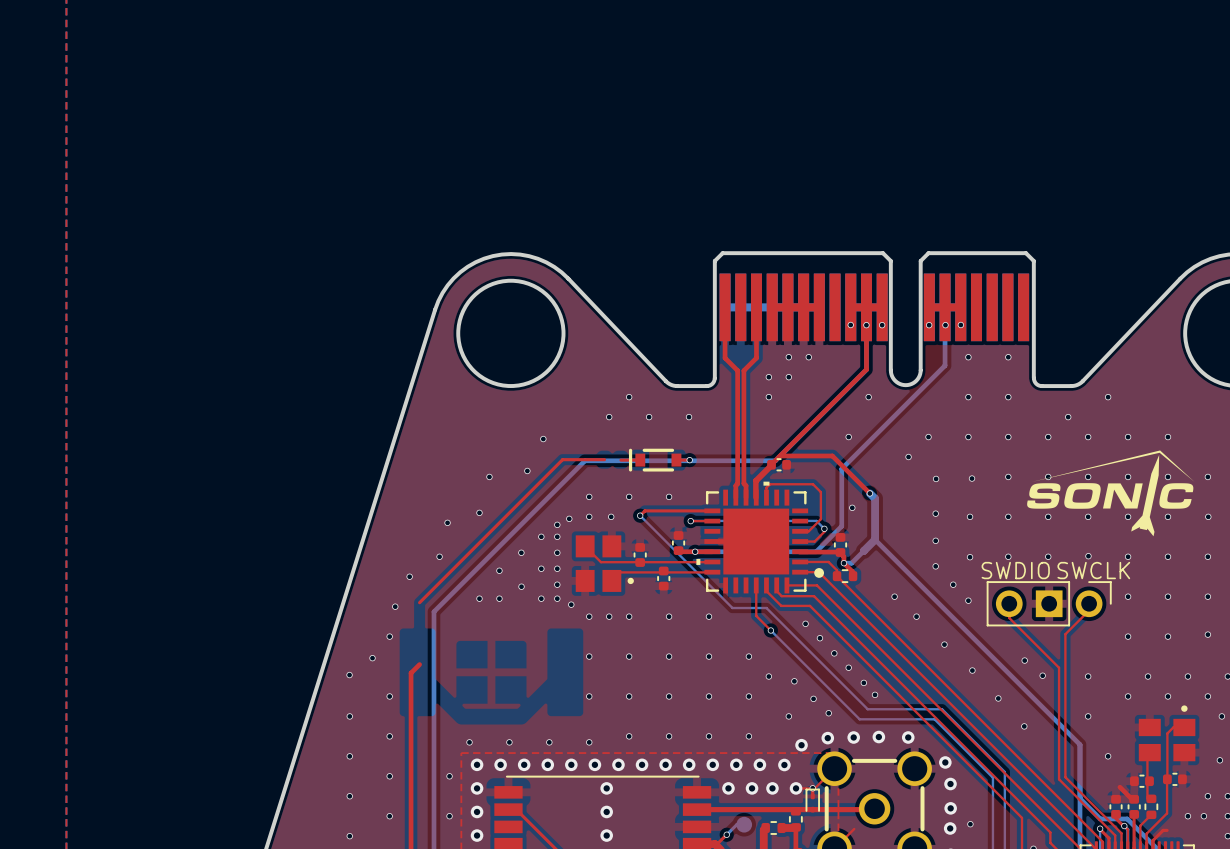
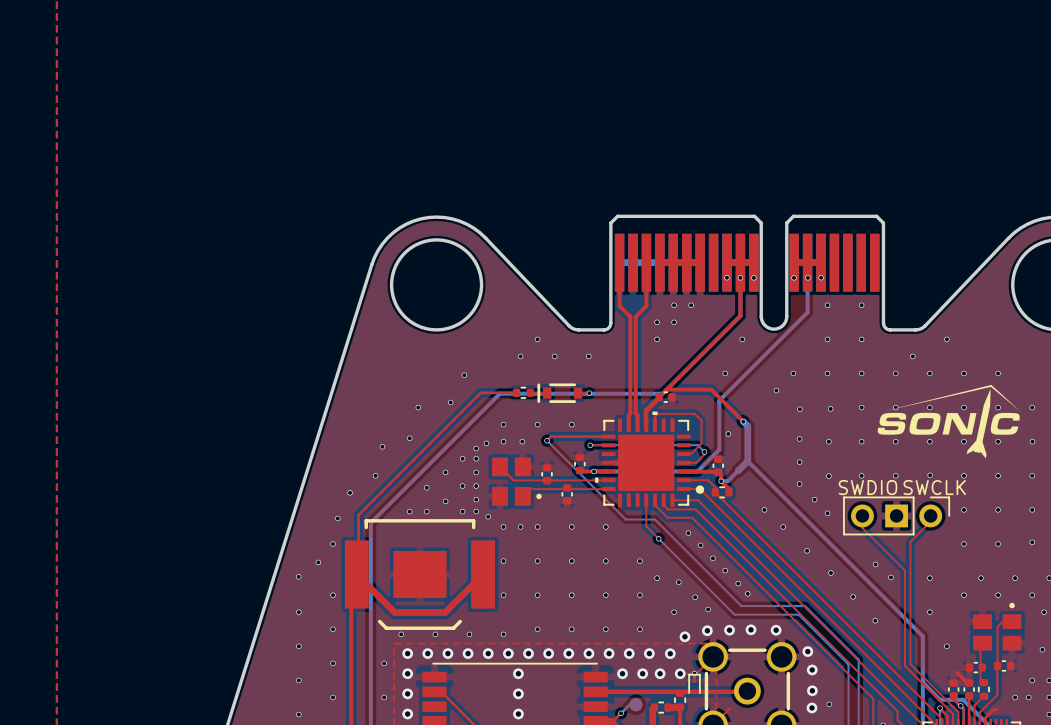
part: none -> (523, 392)
top track: none -> (358, 515) (358, 567)
top track: none -> (356, 574) (394, 612) (445, 612) (483, 574)
part: none -> (419, 574)

